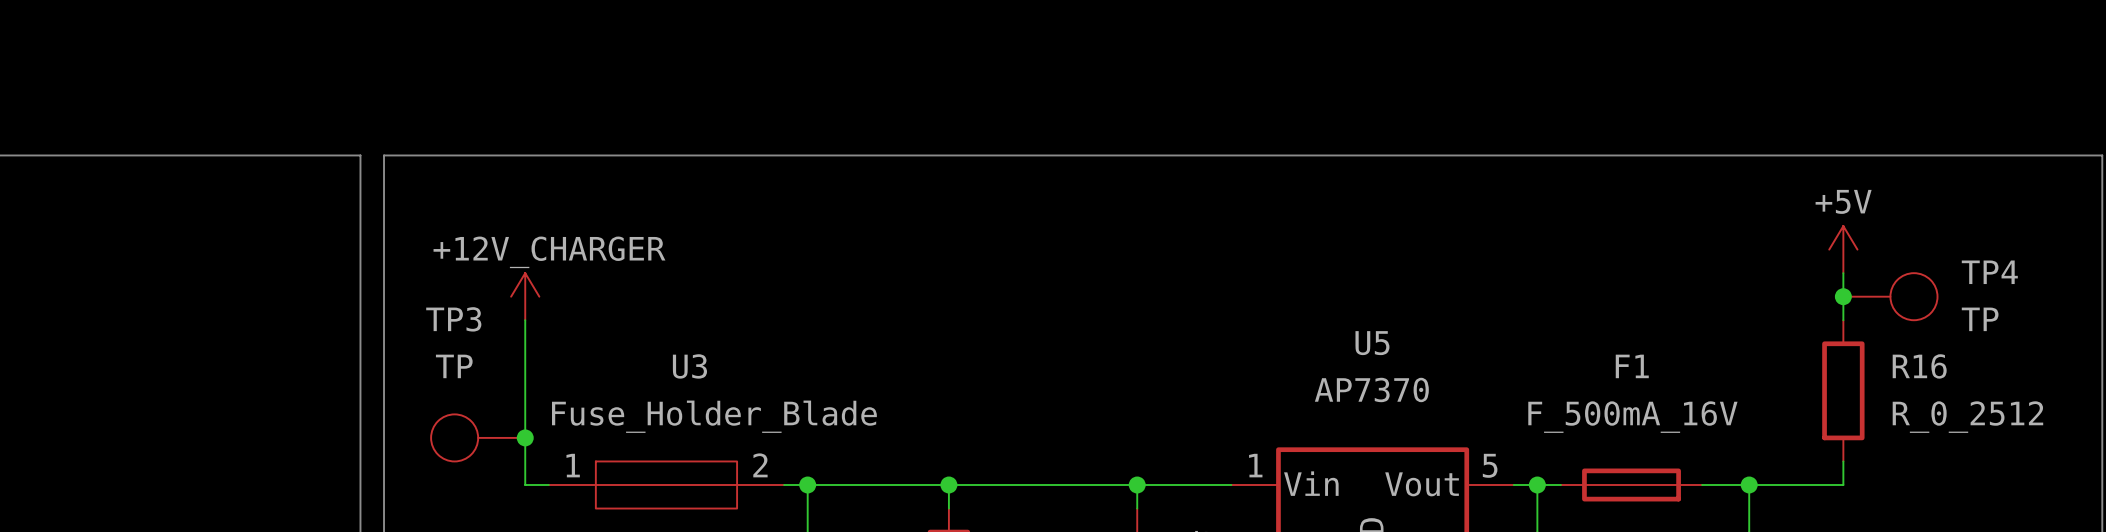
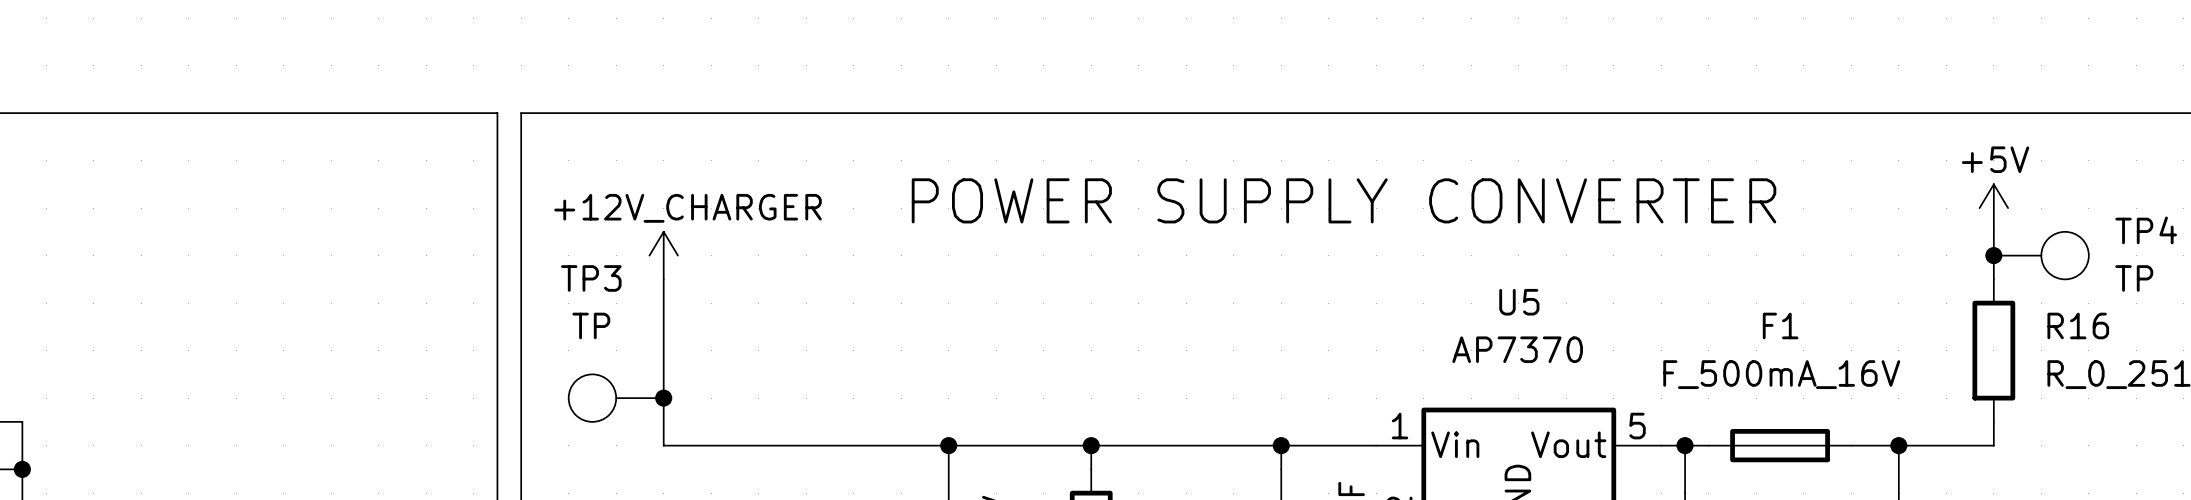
text: none -> POWER SUPPLY CONVERTER (1344, 200)
U3: Fuse_Holder_Blade (666, 484) -> none

